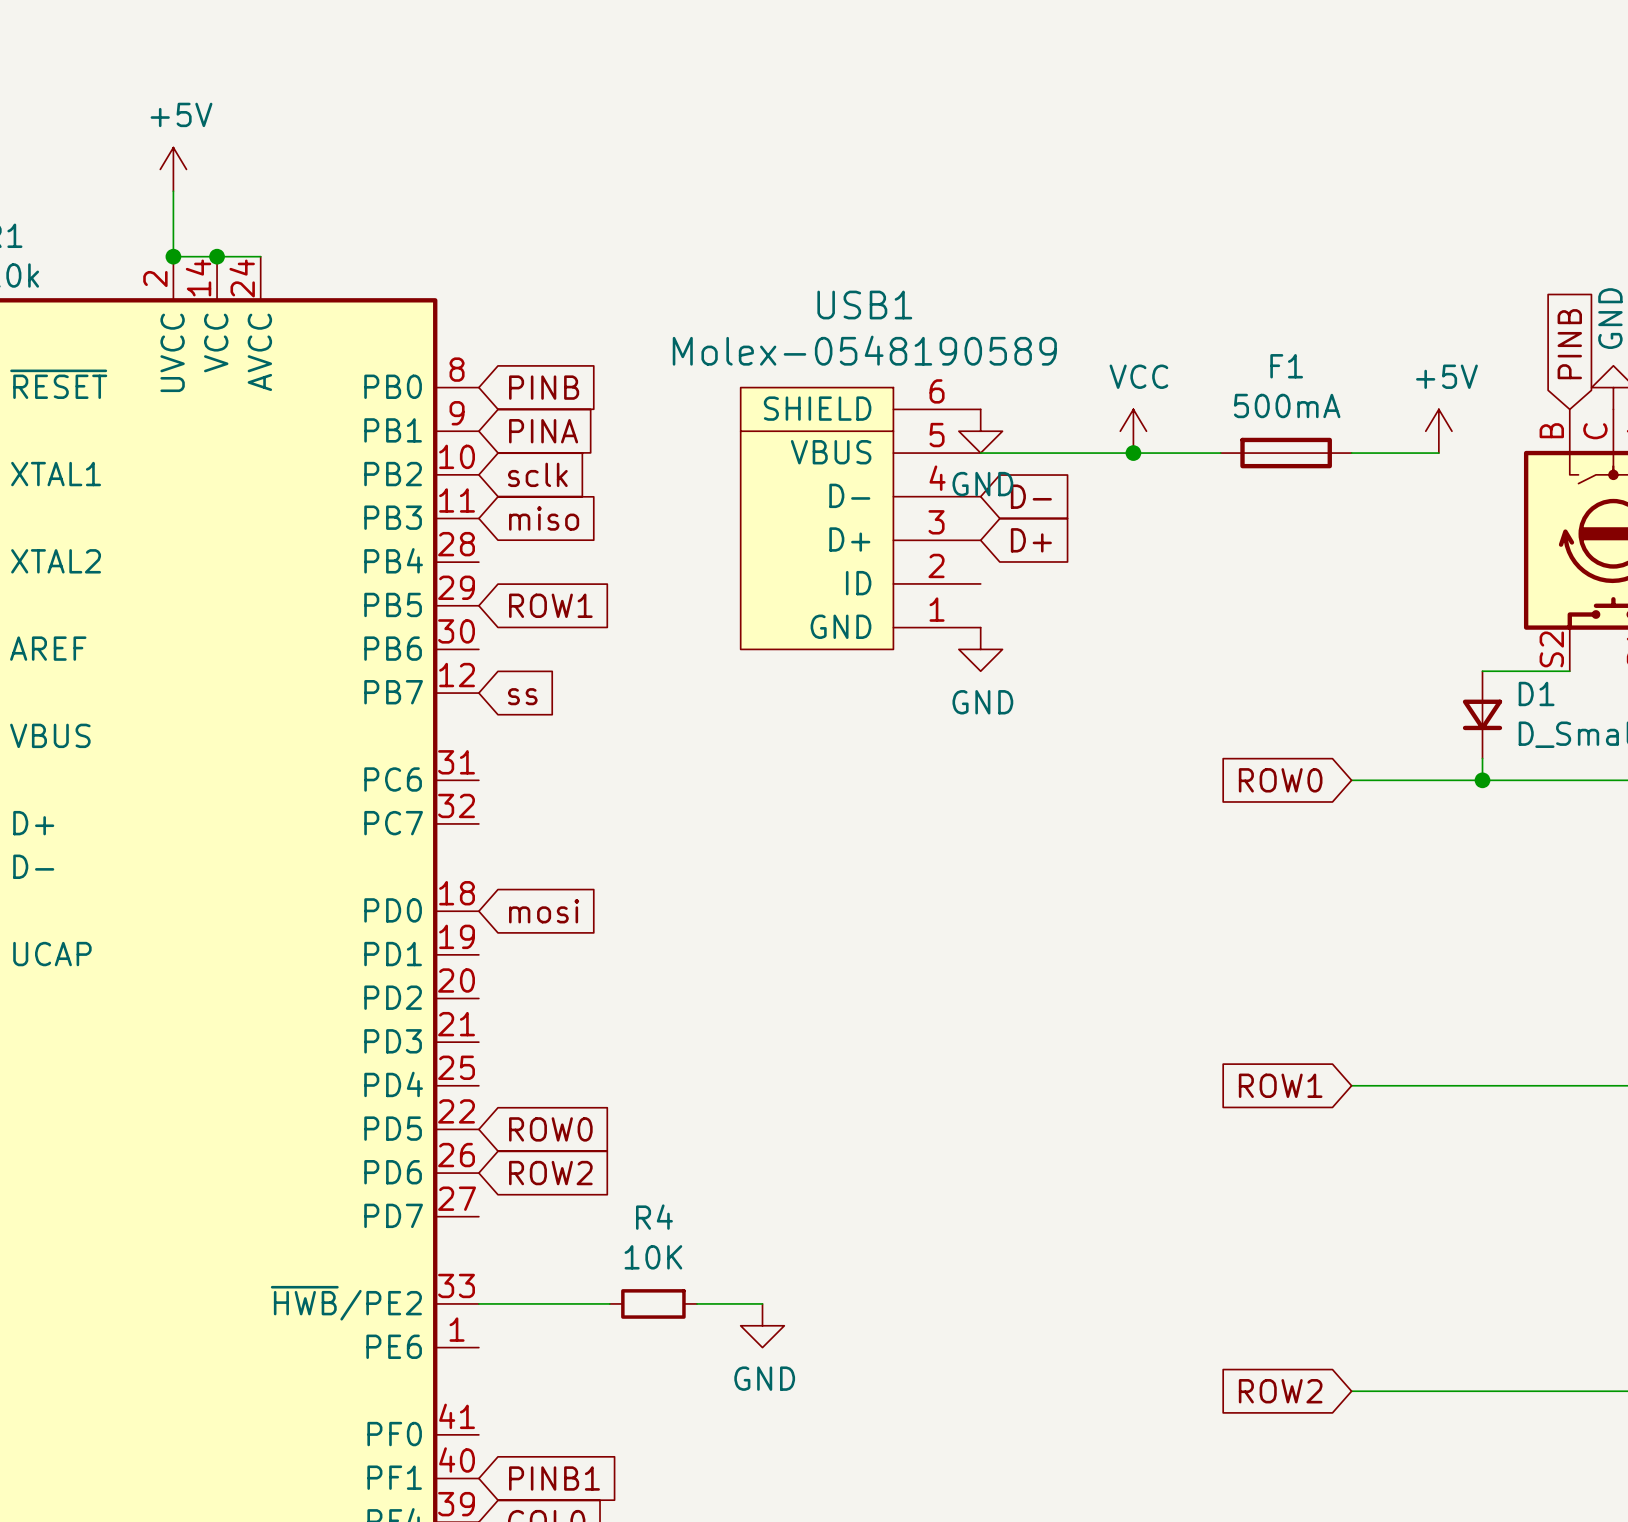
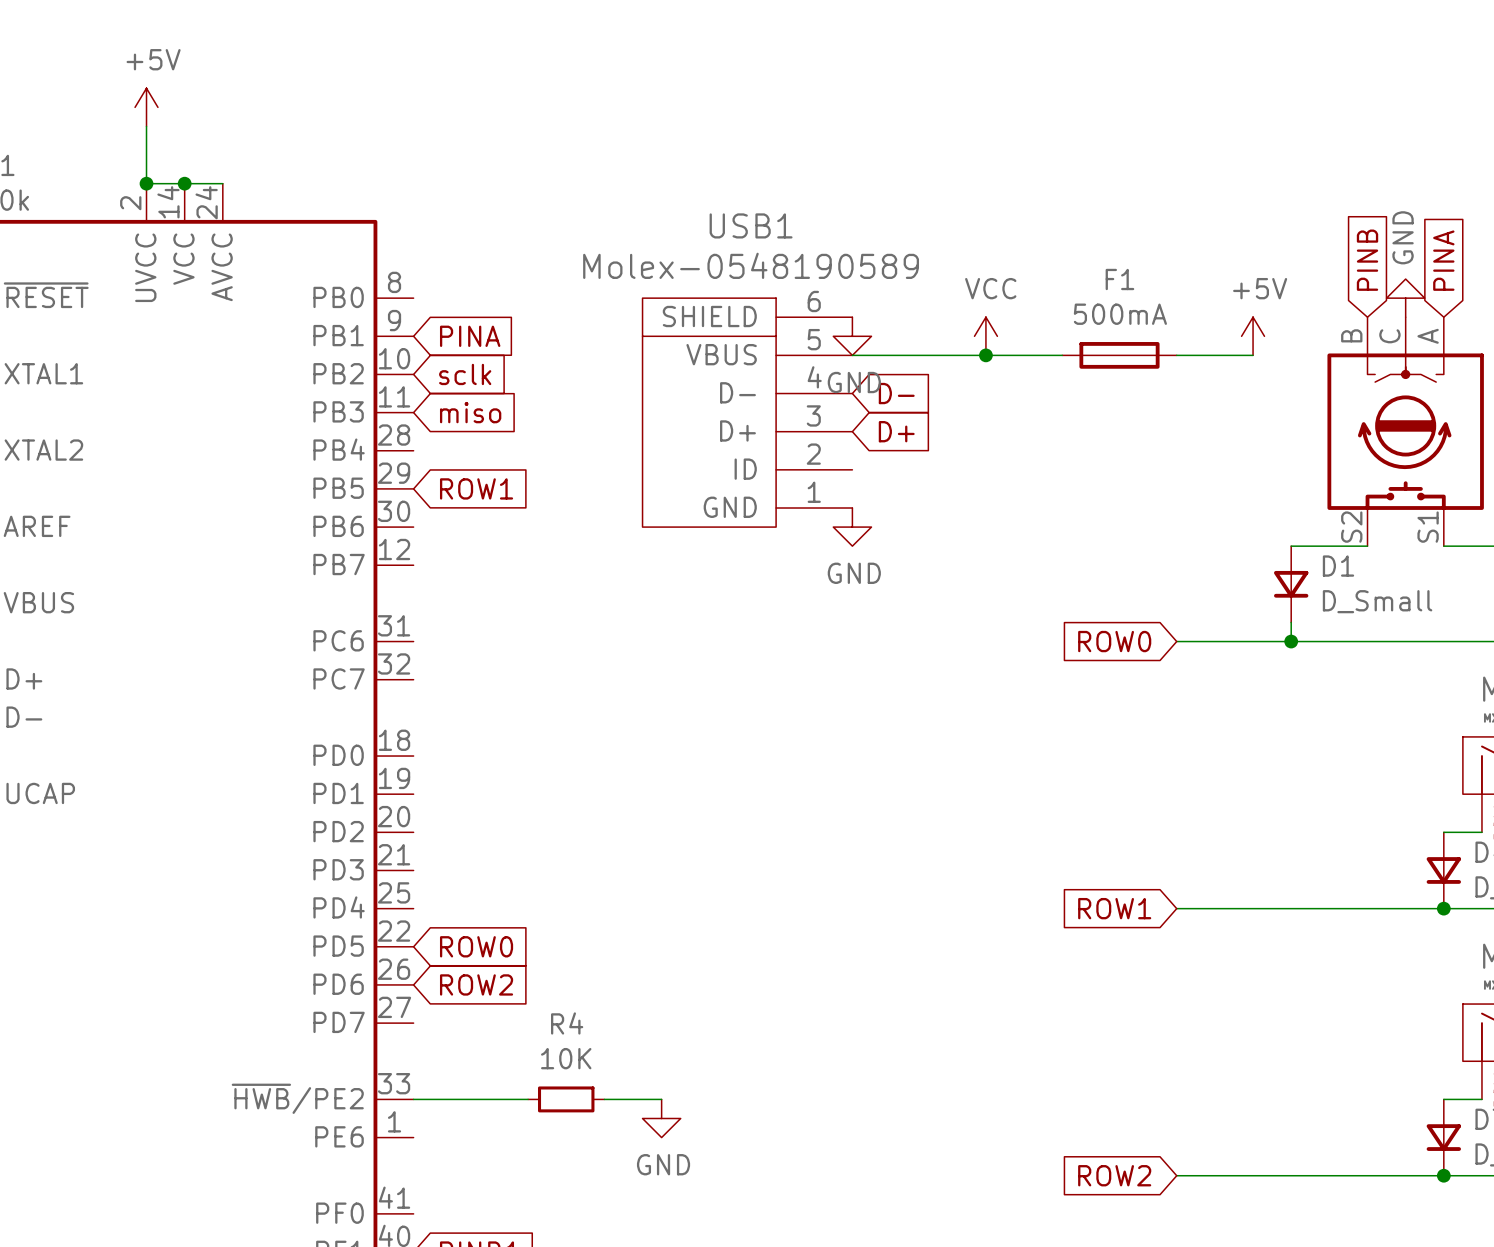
global label: PINB (544, 387) -> none
global label: ss (522, 696) -> none
global label: mosi (544, 911) -> none

